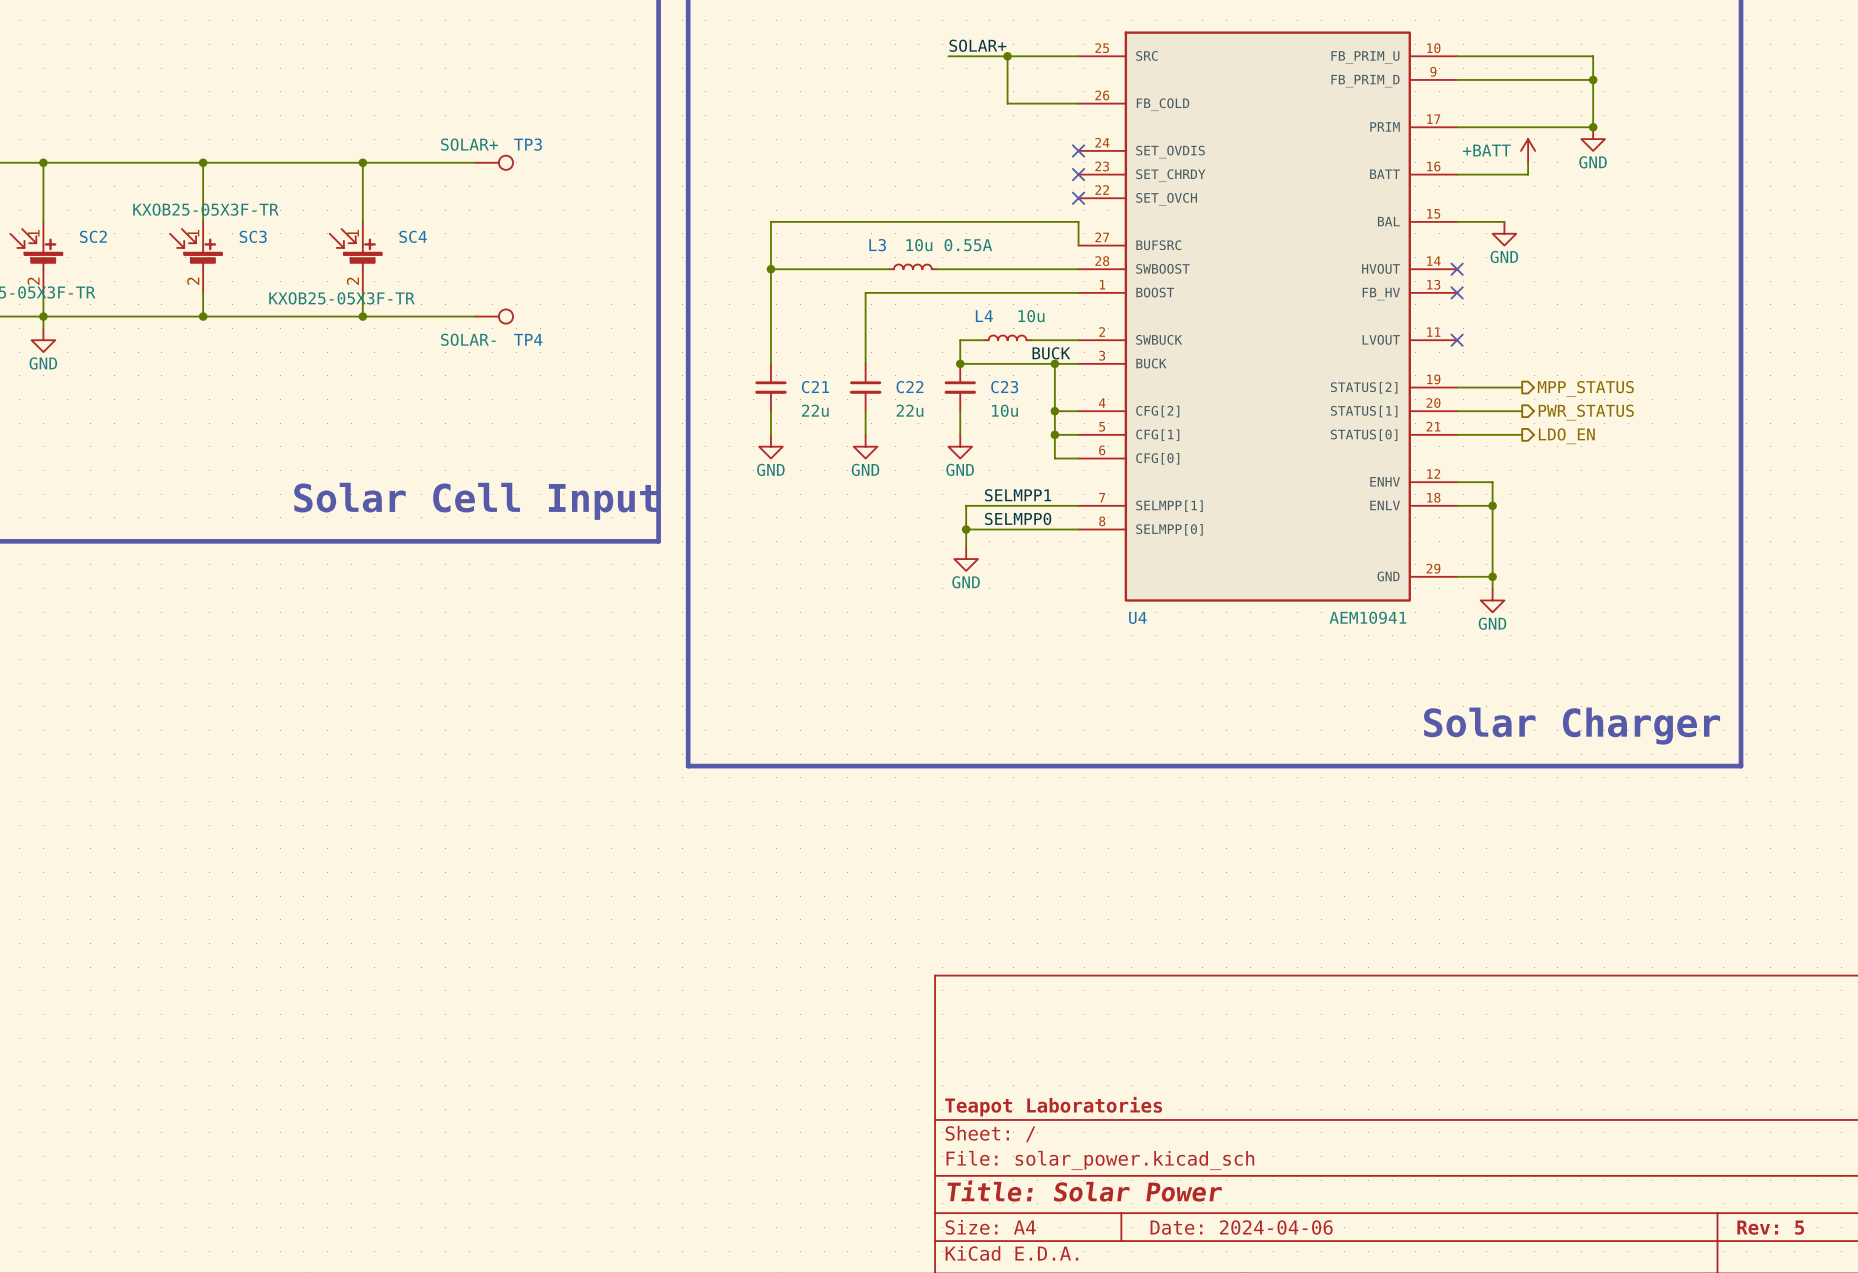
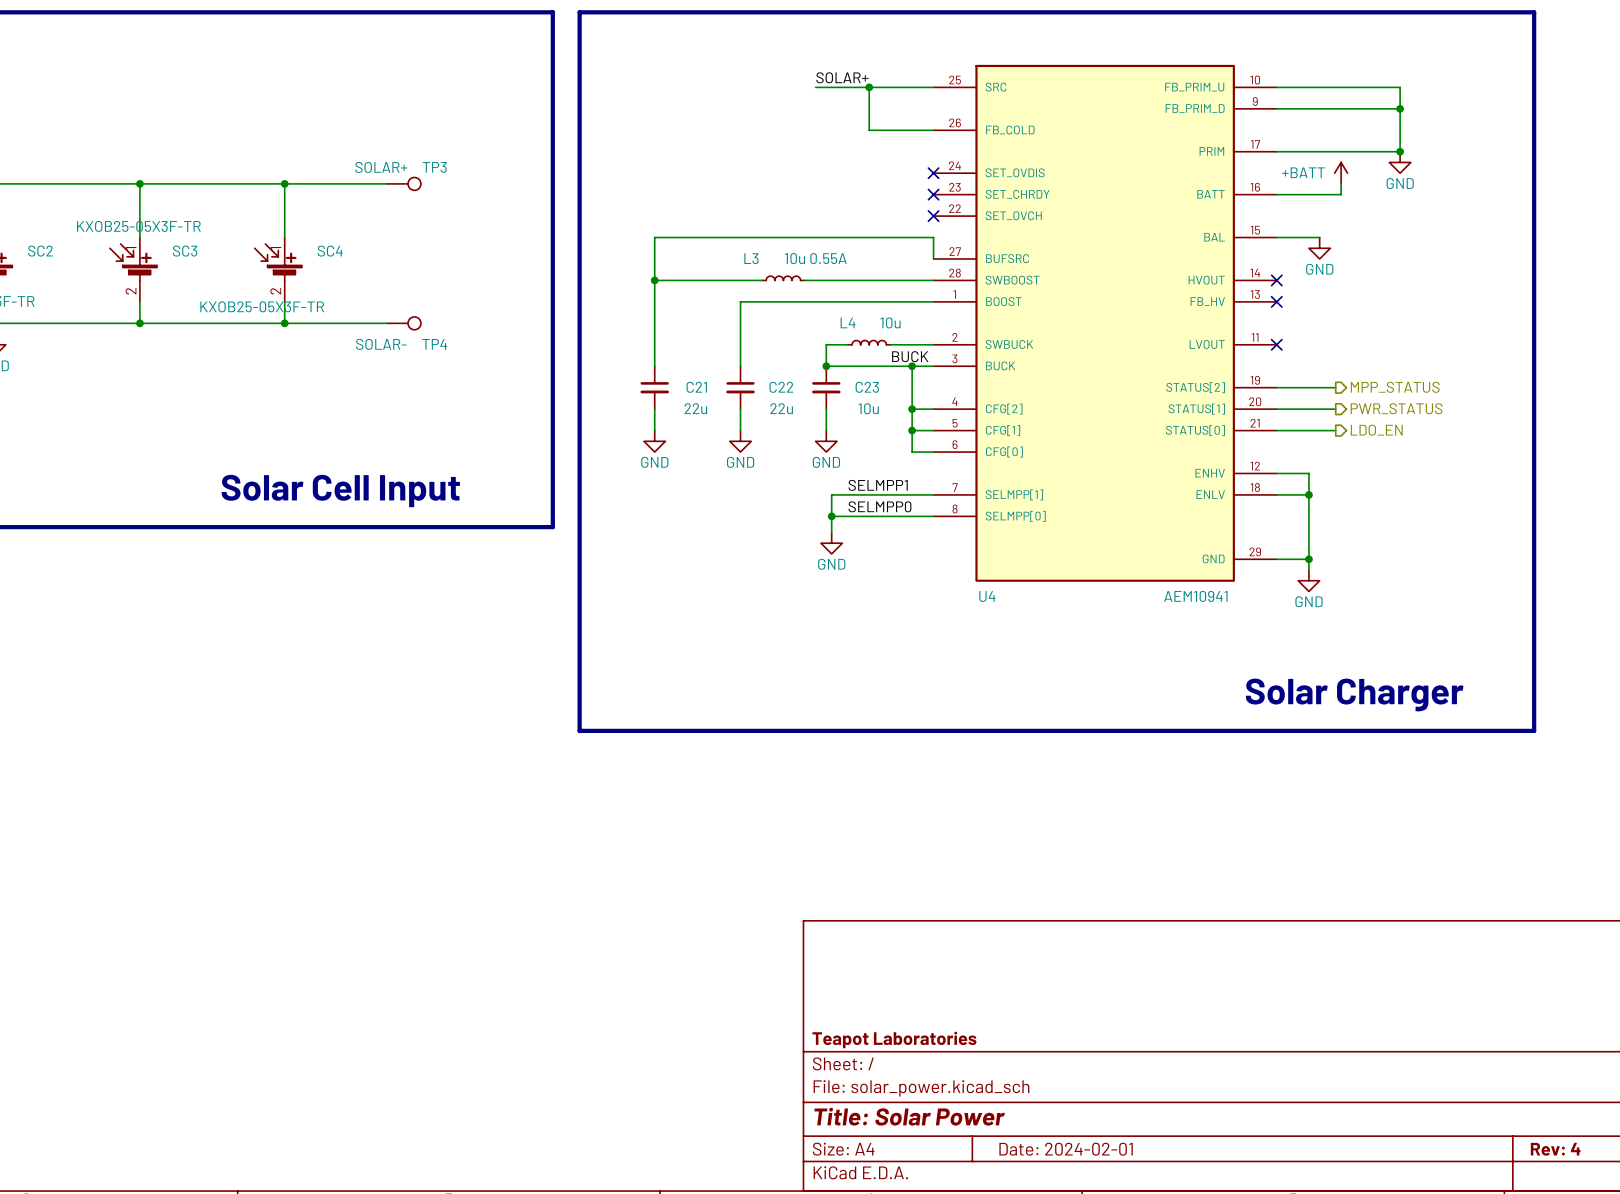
title block: Date: 2024-04-06 (1241, 1227) -> Date: 2024-02-01 (1066, 1149)
title block: Rev: 5 (1770, 1227) -> Rev: 4 (1555, 1149)

